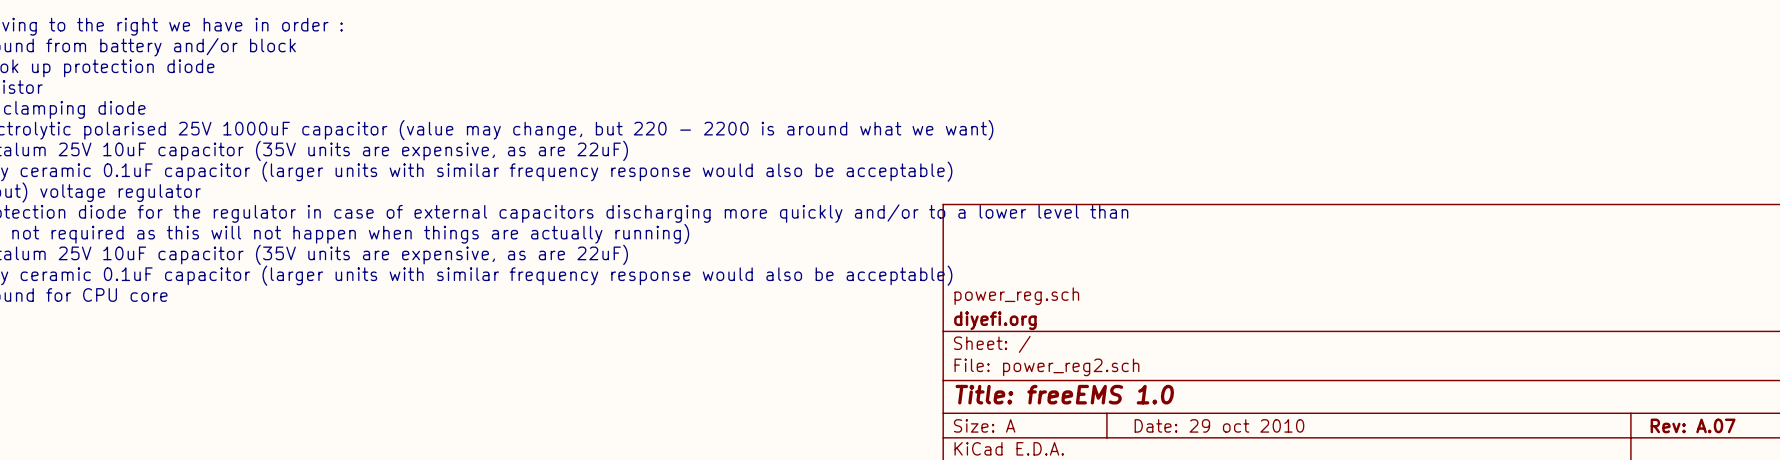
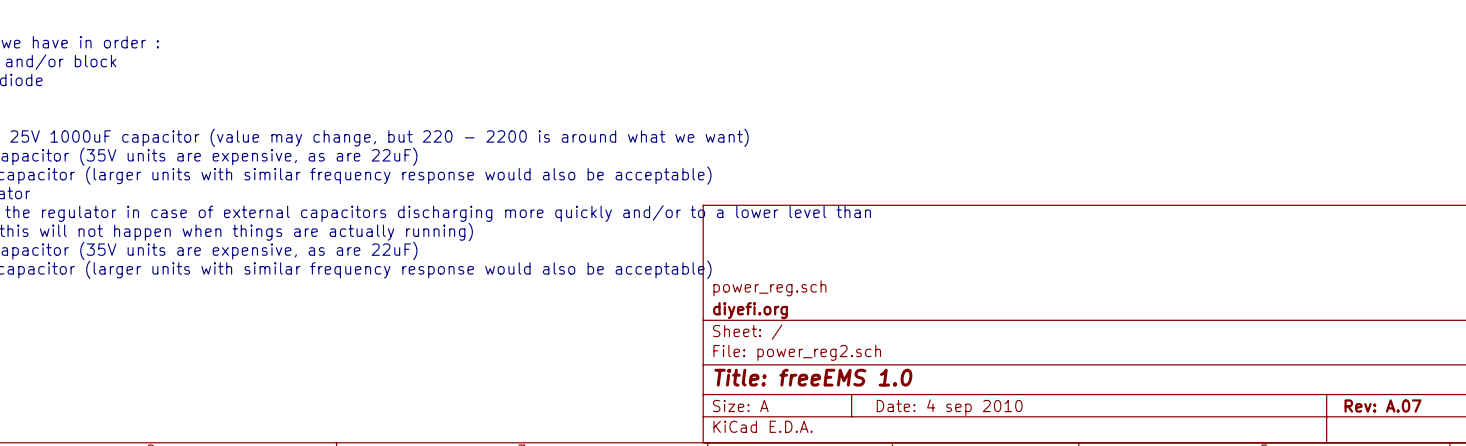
title block: Date: 29 oct 2010 (1219, 425) -> Date: 4 sep 2010 (949, 407)

